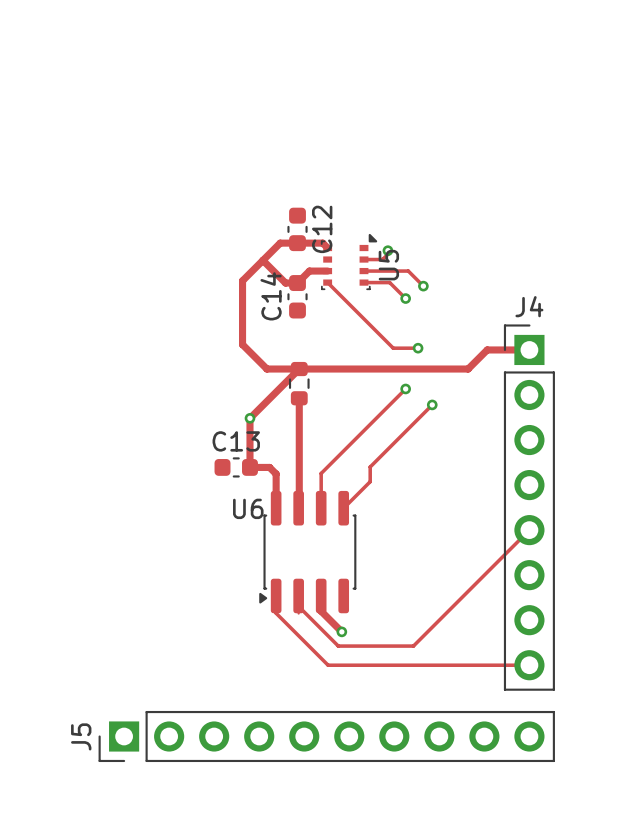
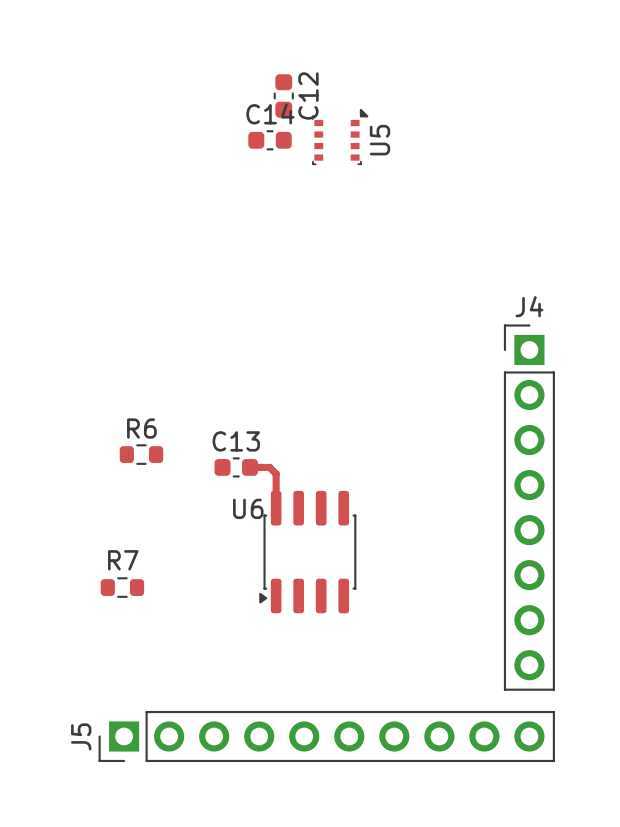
C12 position: (297, 229) -> (283, 95)
track: (327, 248) (322, 243) (280, 243) (242, 280) (242, 344) (266, 369) (468, 369) (487, 349) (529, 349) -> none
track: (387, 250) (387, 254) (382, 259) (364, 259) -> none
via: (387, 250) -> none
track: (262, 260) (285, 283) (297, 283) (309, 271) (327, 271) -> none
U5 position: (349, 262) -> (340, 137)
track: (364, 271) (408, 271) (423, 286) -> none
track: (327, 282) (393, 348) (418, 348) -> none
track: (364, 282) (389, 282) (405, 298) -> none
via: (423, 286) -> none
C14 rotation: 0° (297, 296) -> 90° clockwise (270, 140)
C14 position: (297, 296) -> (270, 140)
via: (405, 298) -> none
via: (418, 348) -> none
track: (299, 369) (249, 418) (249, 467) -> none
part: (299, 383) -> none
track: (405, 388) (321, 473) (321, 508) -> none
via: (405, 388) -> none
track: (299, 398) (299, 518) -> none
track: (432, 404) (370, 466) (370, 481) (343, 508) -> none
via: (432, 404) -> none
via: (249, 418) -> none
R6: none -> (141, 454)
track: (529, 530) (413, 646) (338, 646) (298, 606) (298, 595) (298, 613) -> none
R7: none -> (122, 587)
track: (276, 595) (276, 613) (328, 665) (529, 665) -> none
track: (321, 595) (321, 611) (341, 631) -> none
via: (341, 631) -> none

